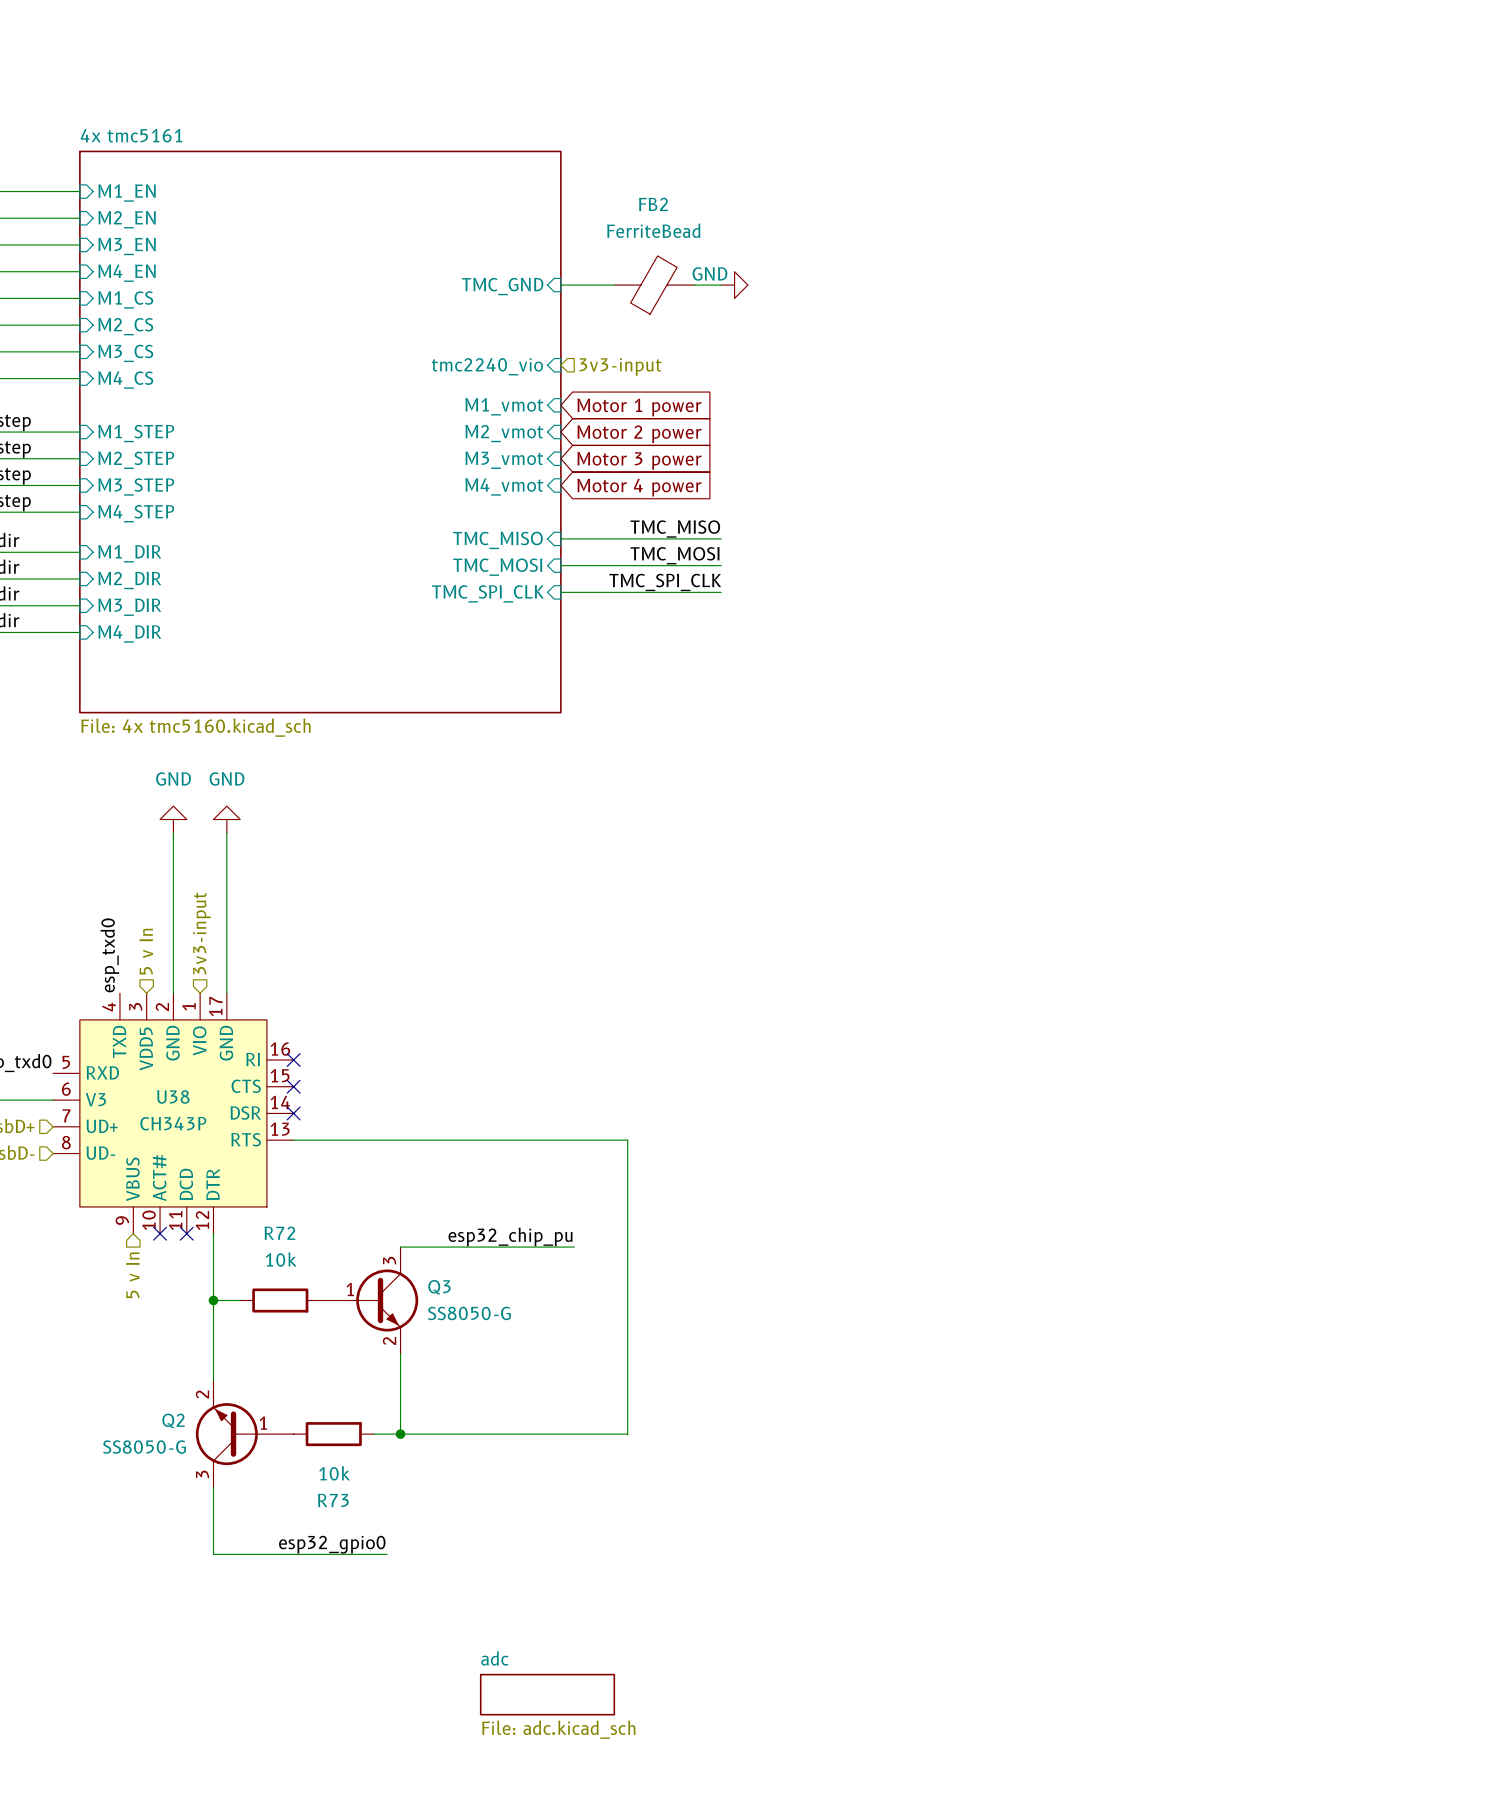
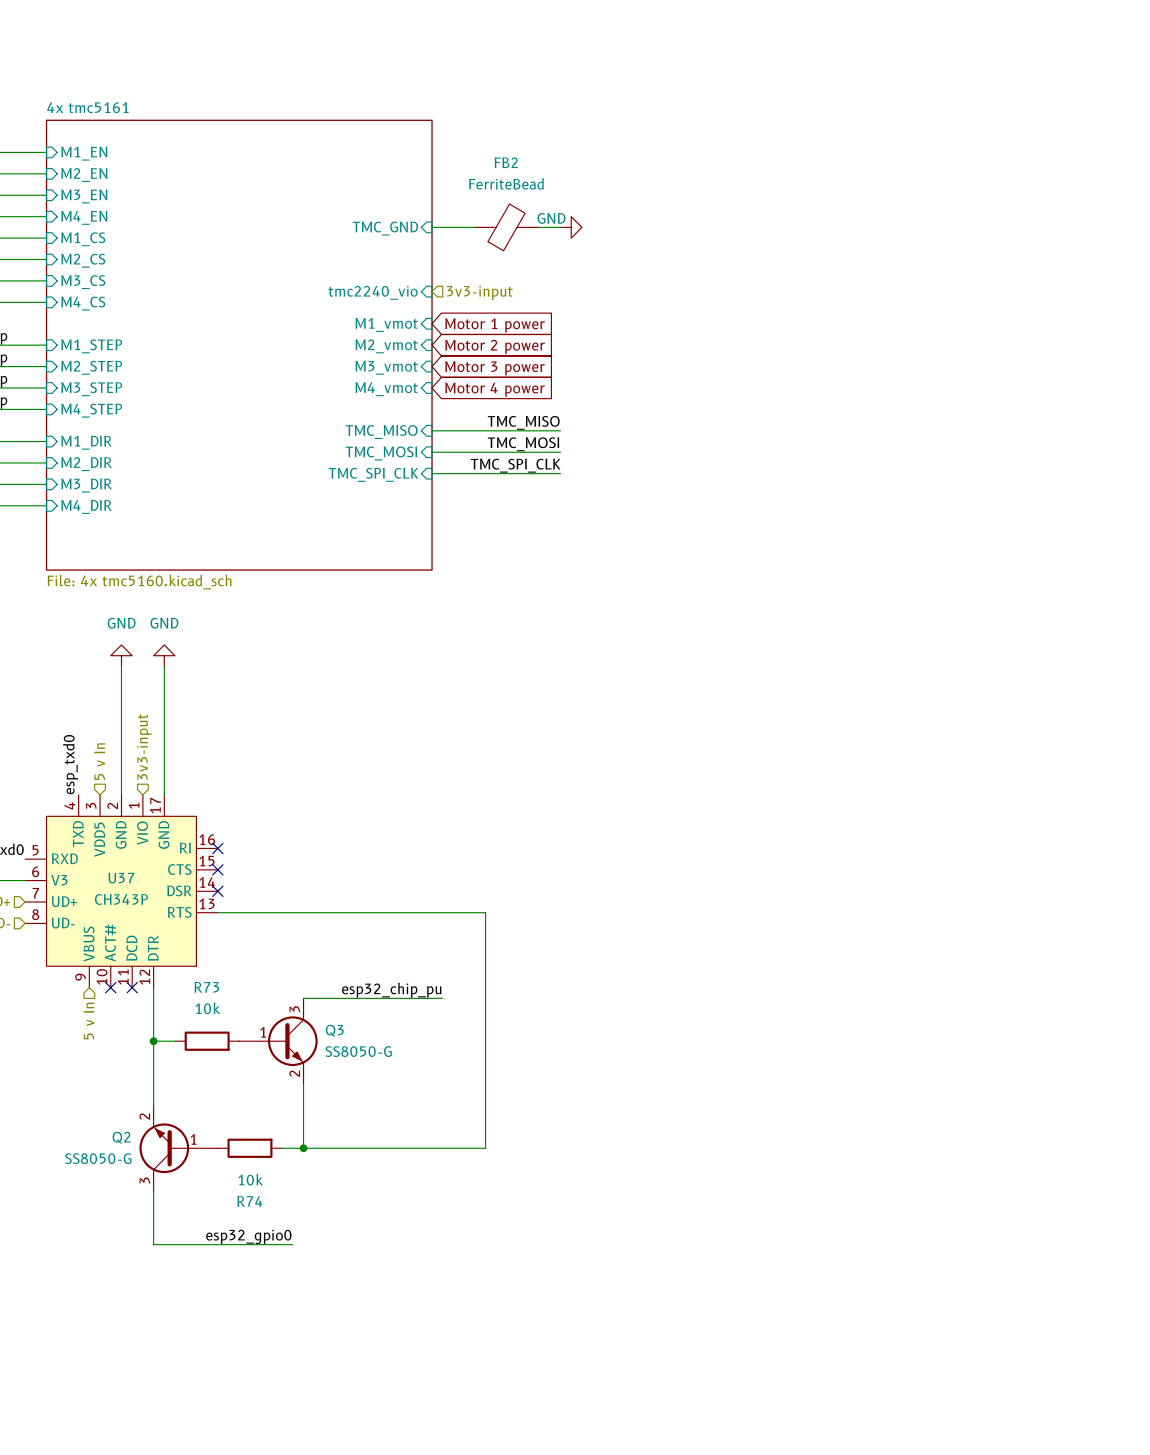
U38 name: U38 (173, 1096) -> U37 (121, 878)
R72 name: R72 (279, 1233) -> R73 (206, 987)
R73 name: R73 (333, 1500) -> R74 (249, 1201)
sheet adc: File: adc.kicad_sch (547, 1694) -> none

